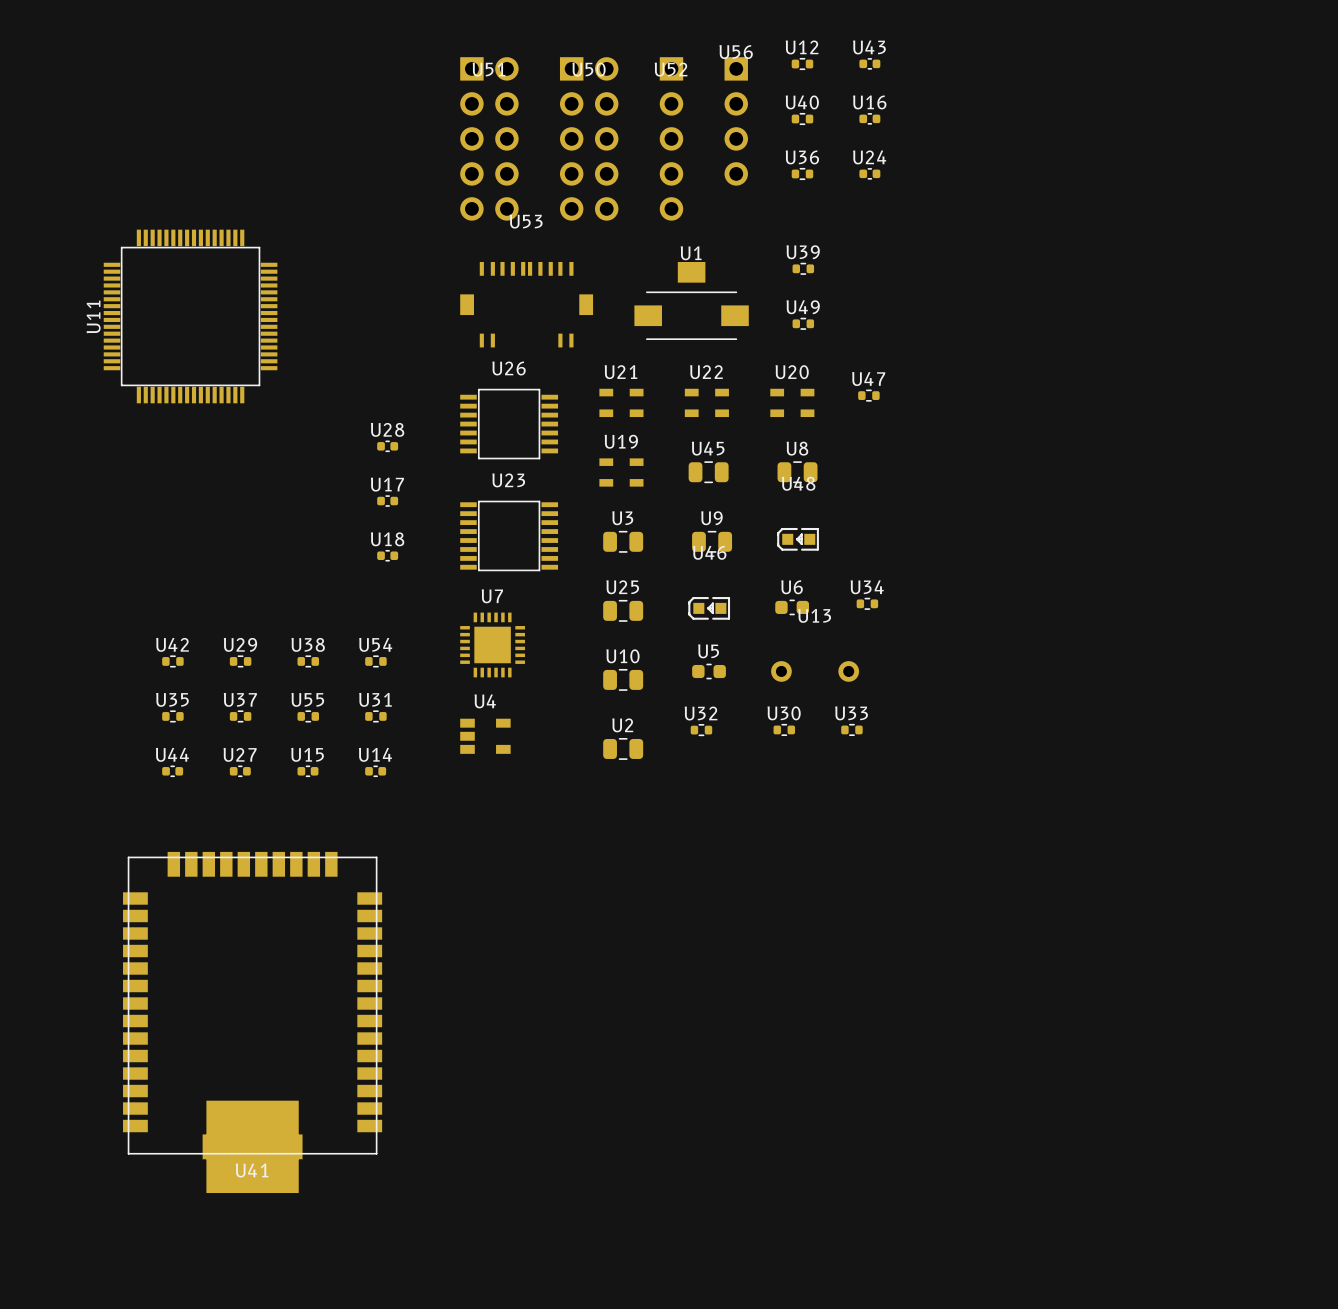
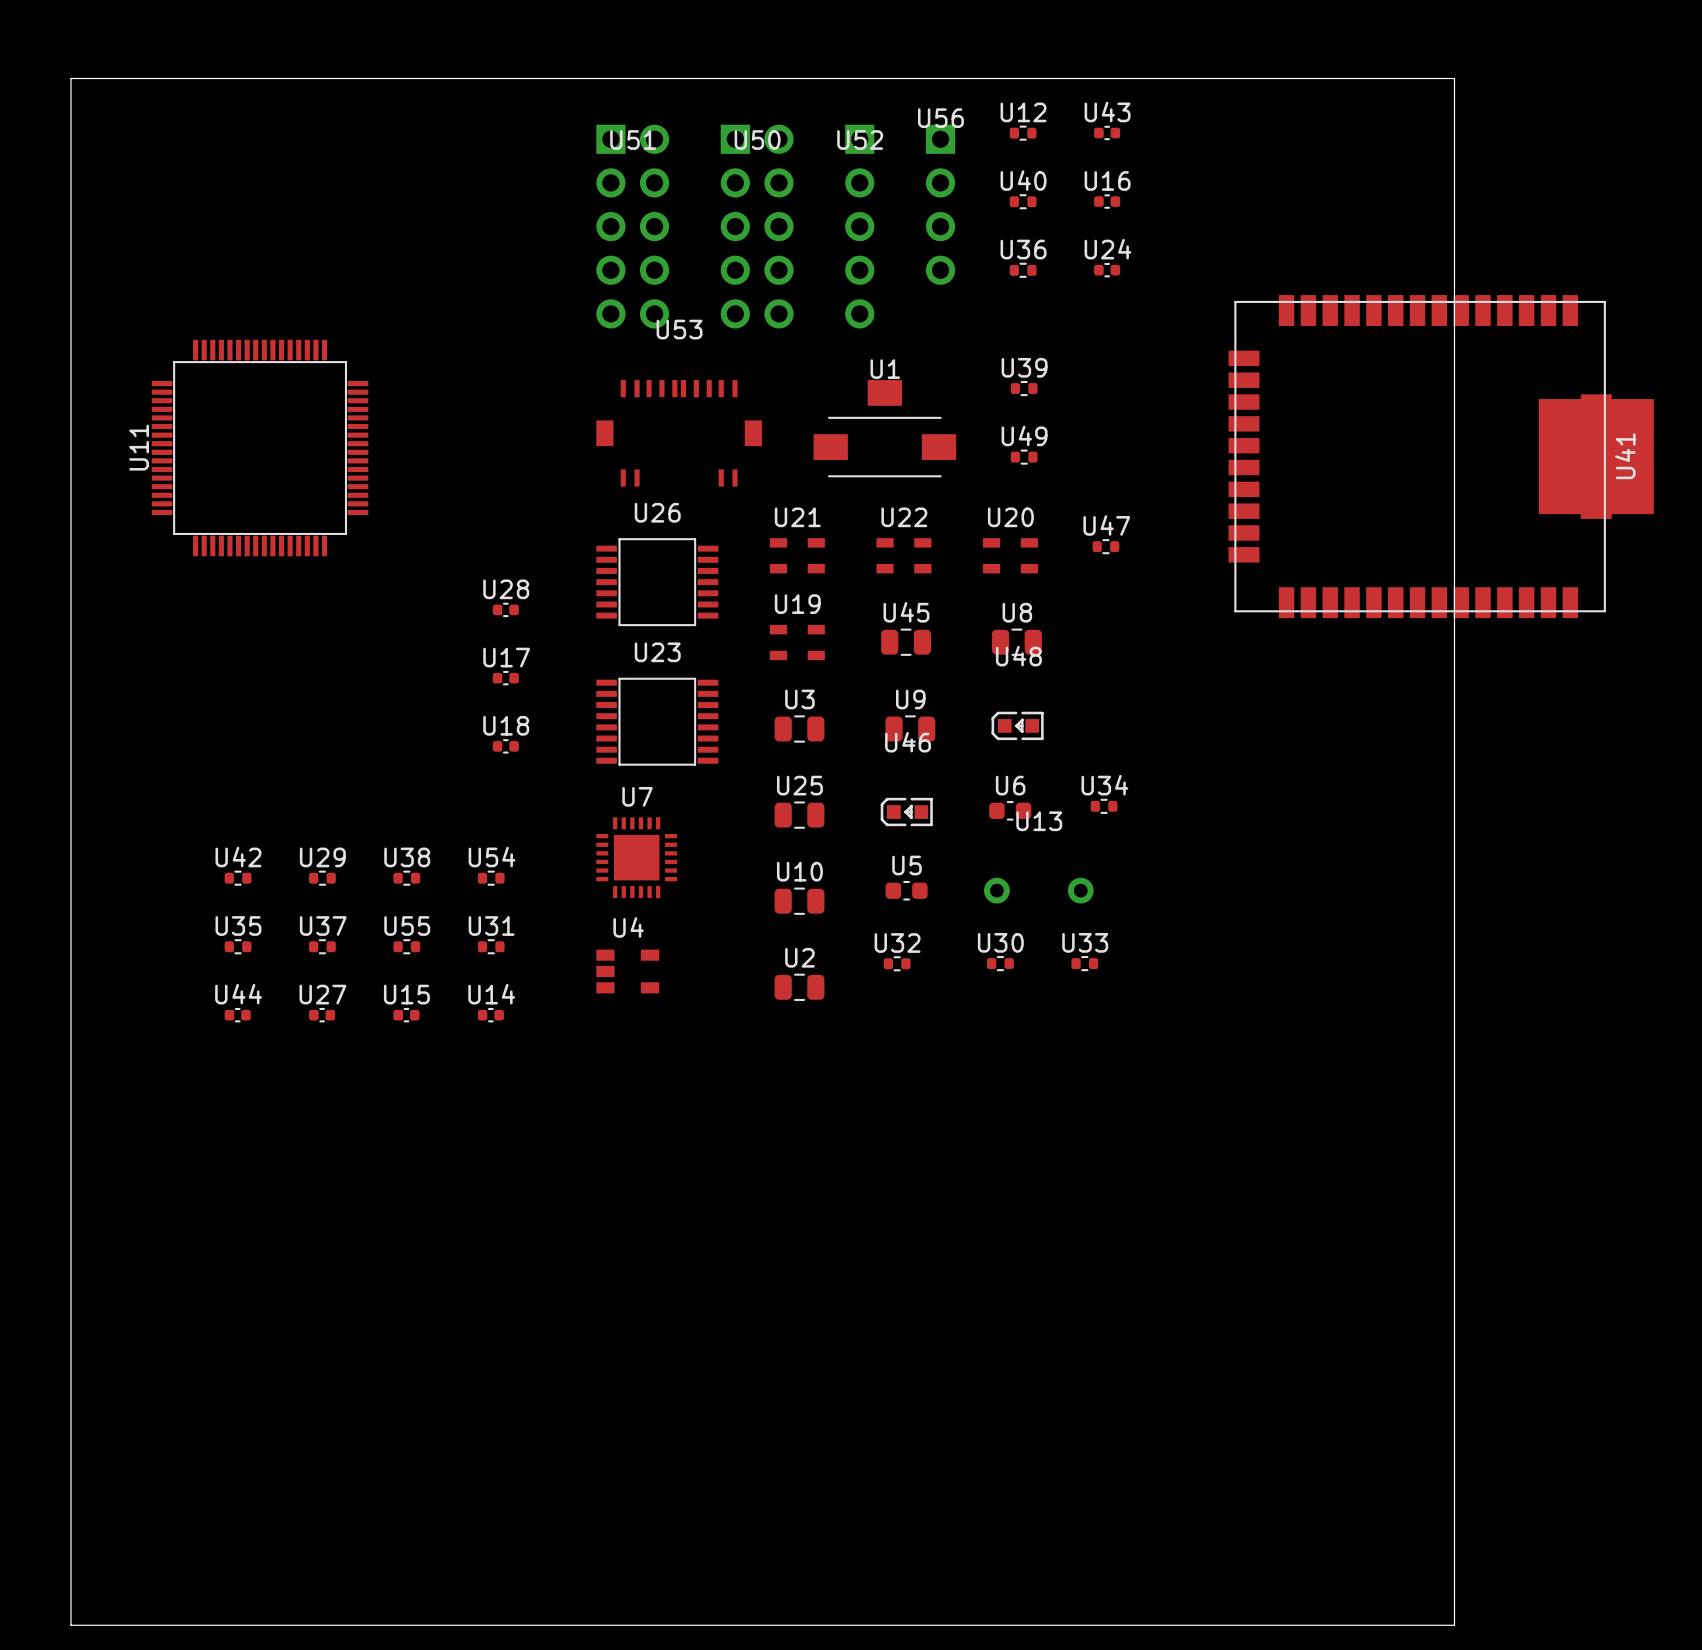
board edge: none -> (71, 78) (1454, 78) (1454, 1625) (71, 1625) (71, 78)
U41 rotation: 0° (252, 1022) -> 90° counterclockwise (1441, 456)
U41 position: (252, 1022) -> (1441, 456)

